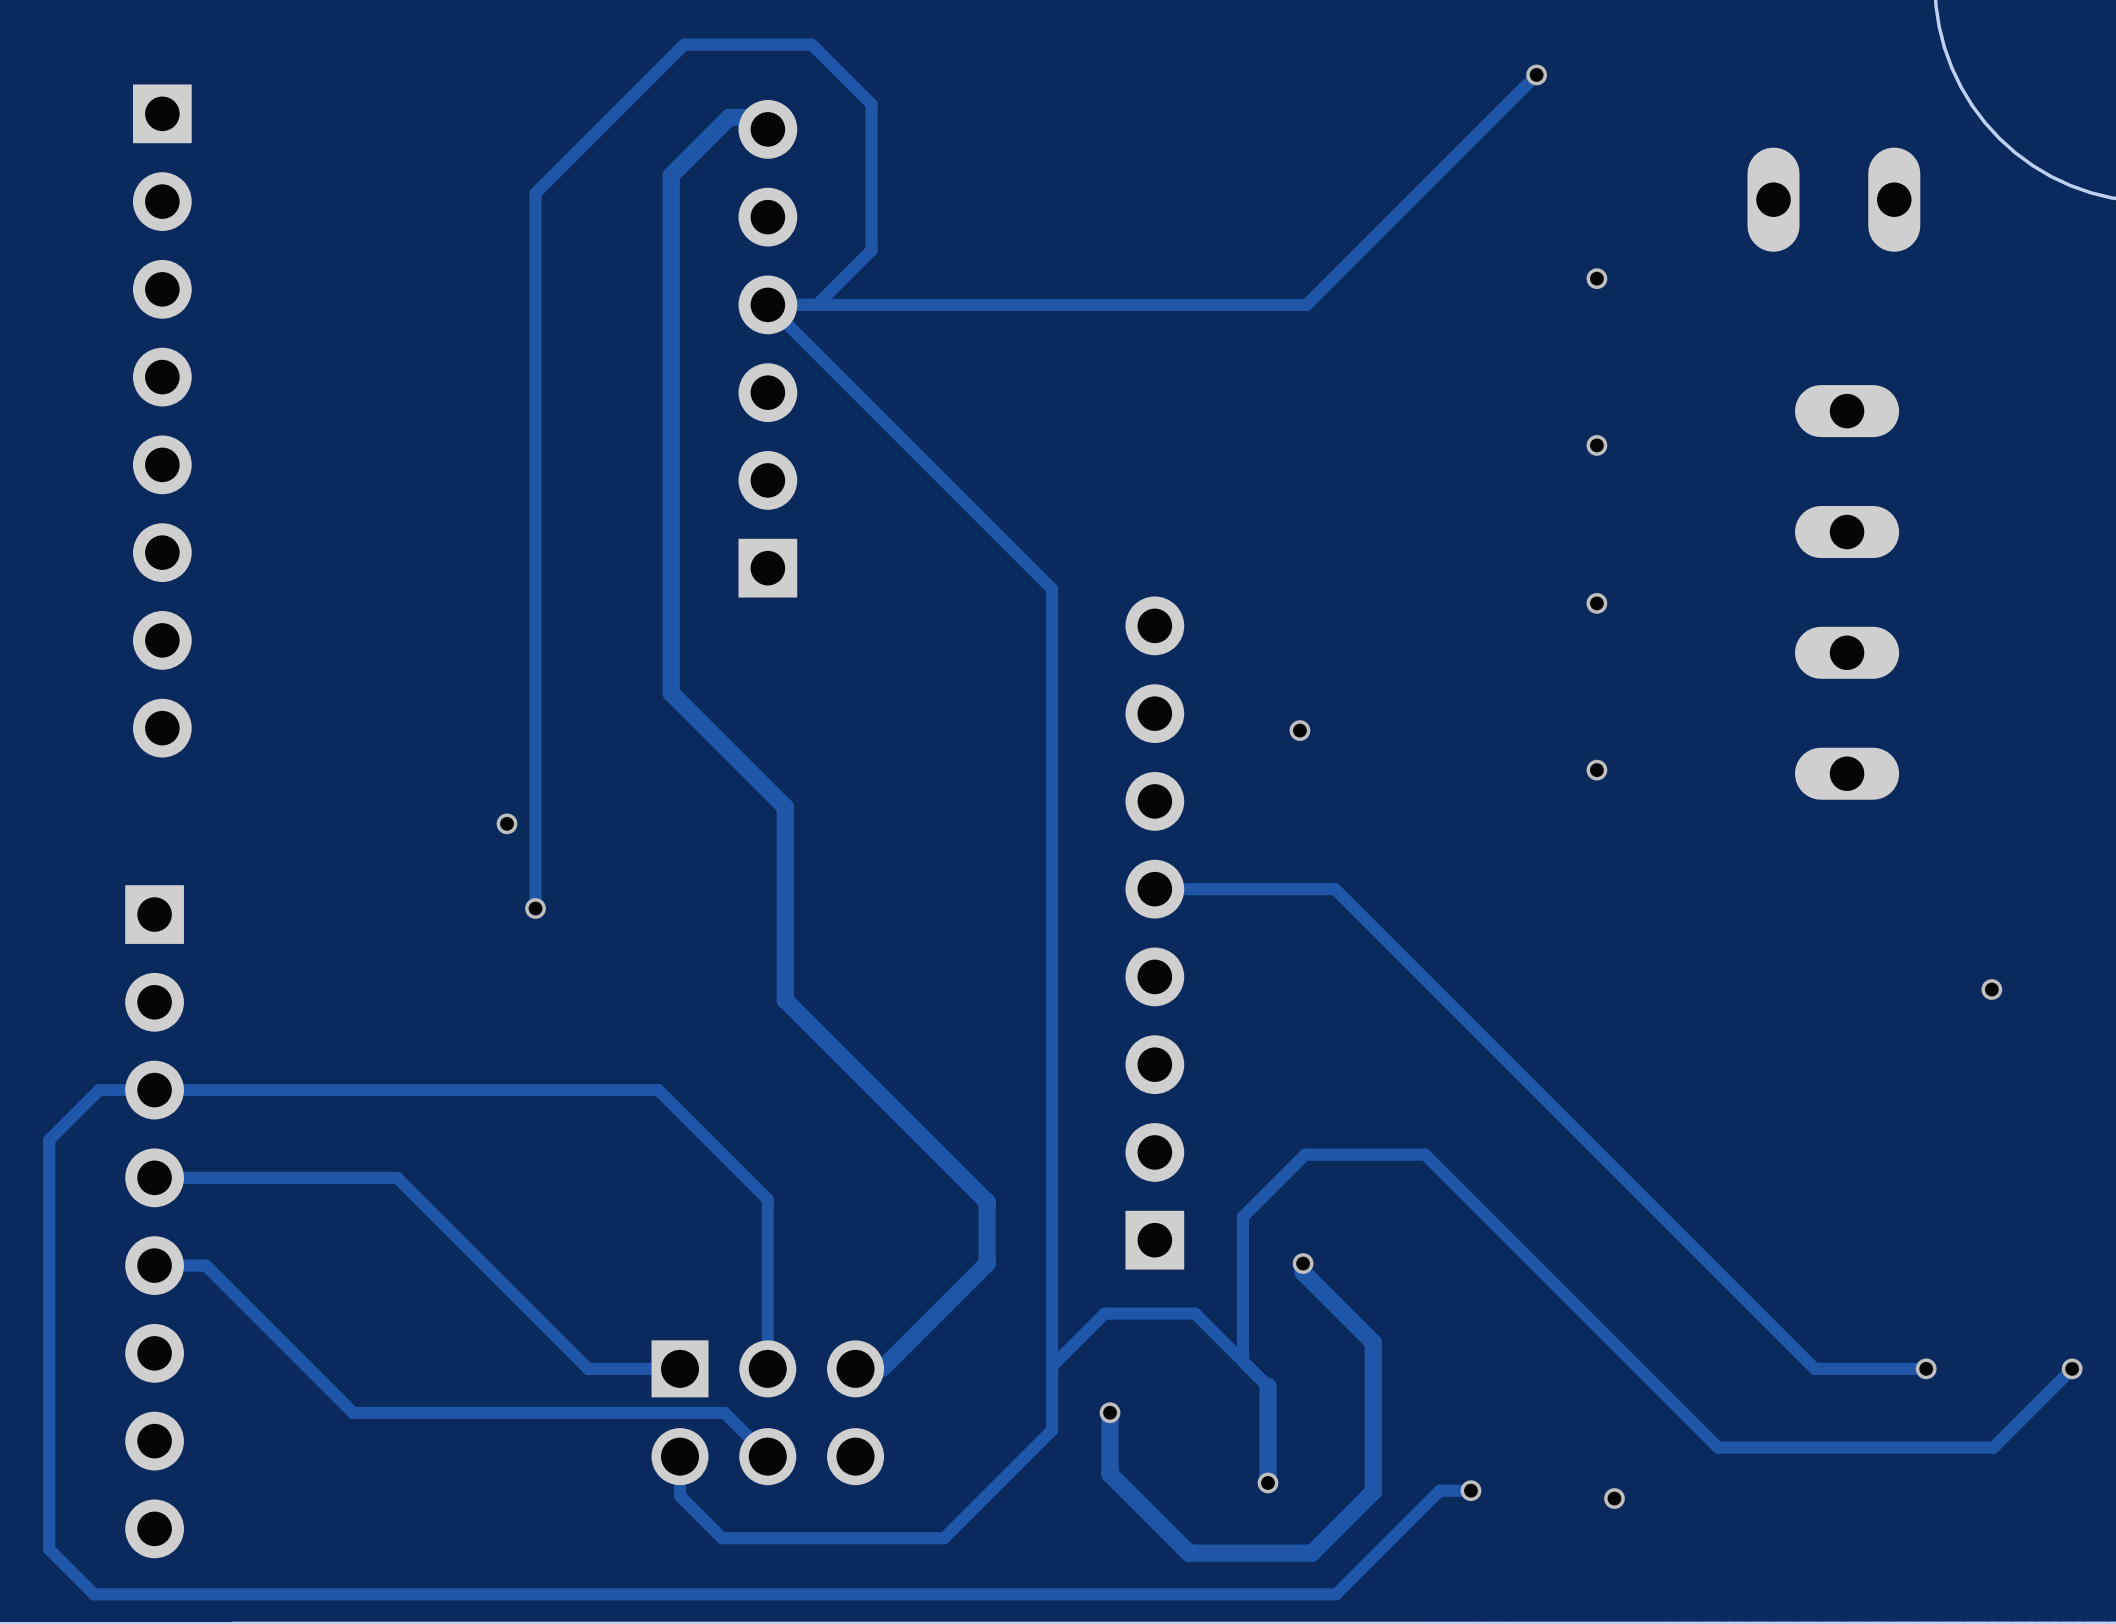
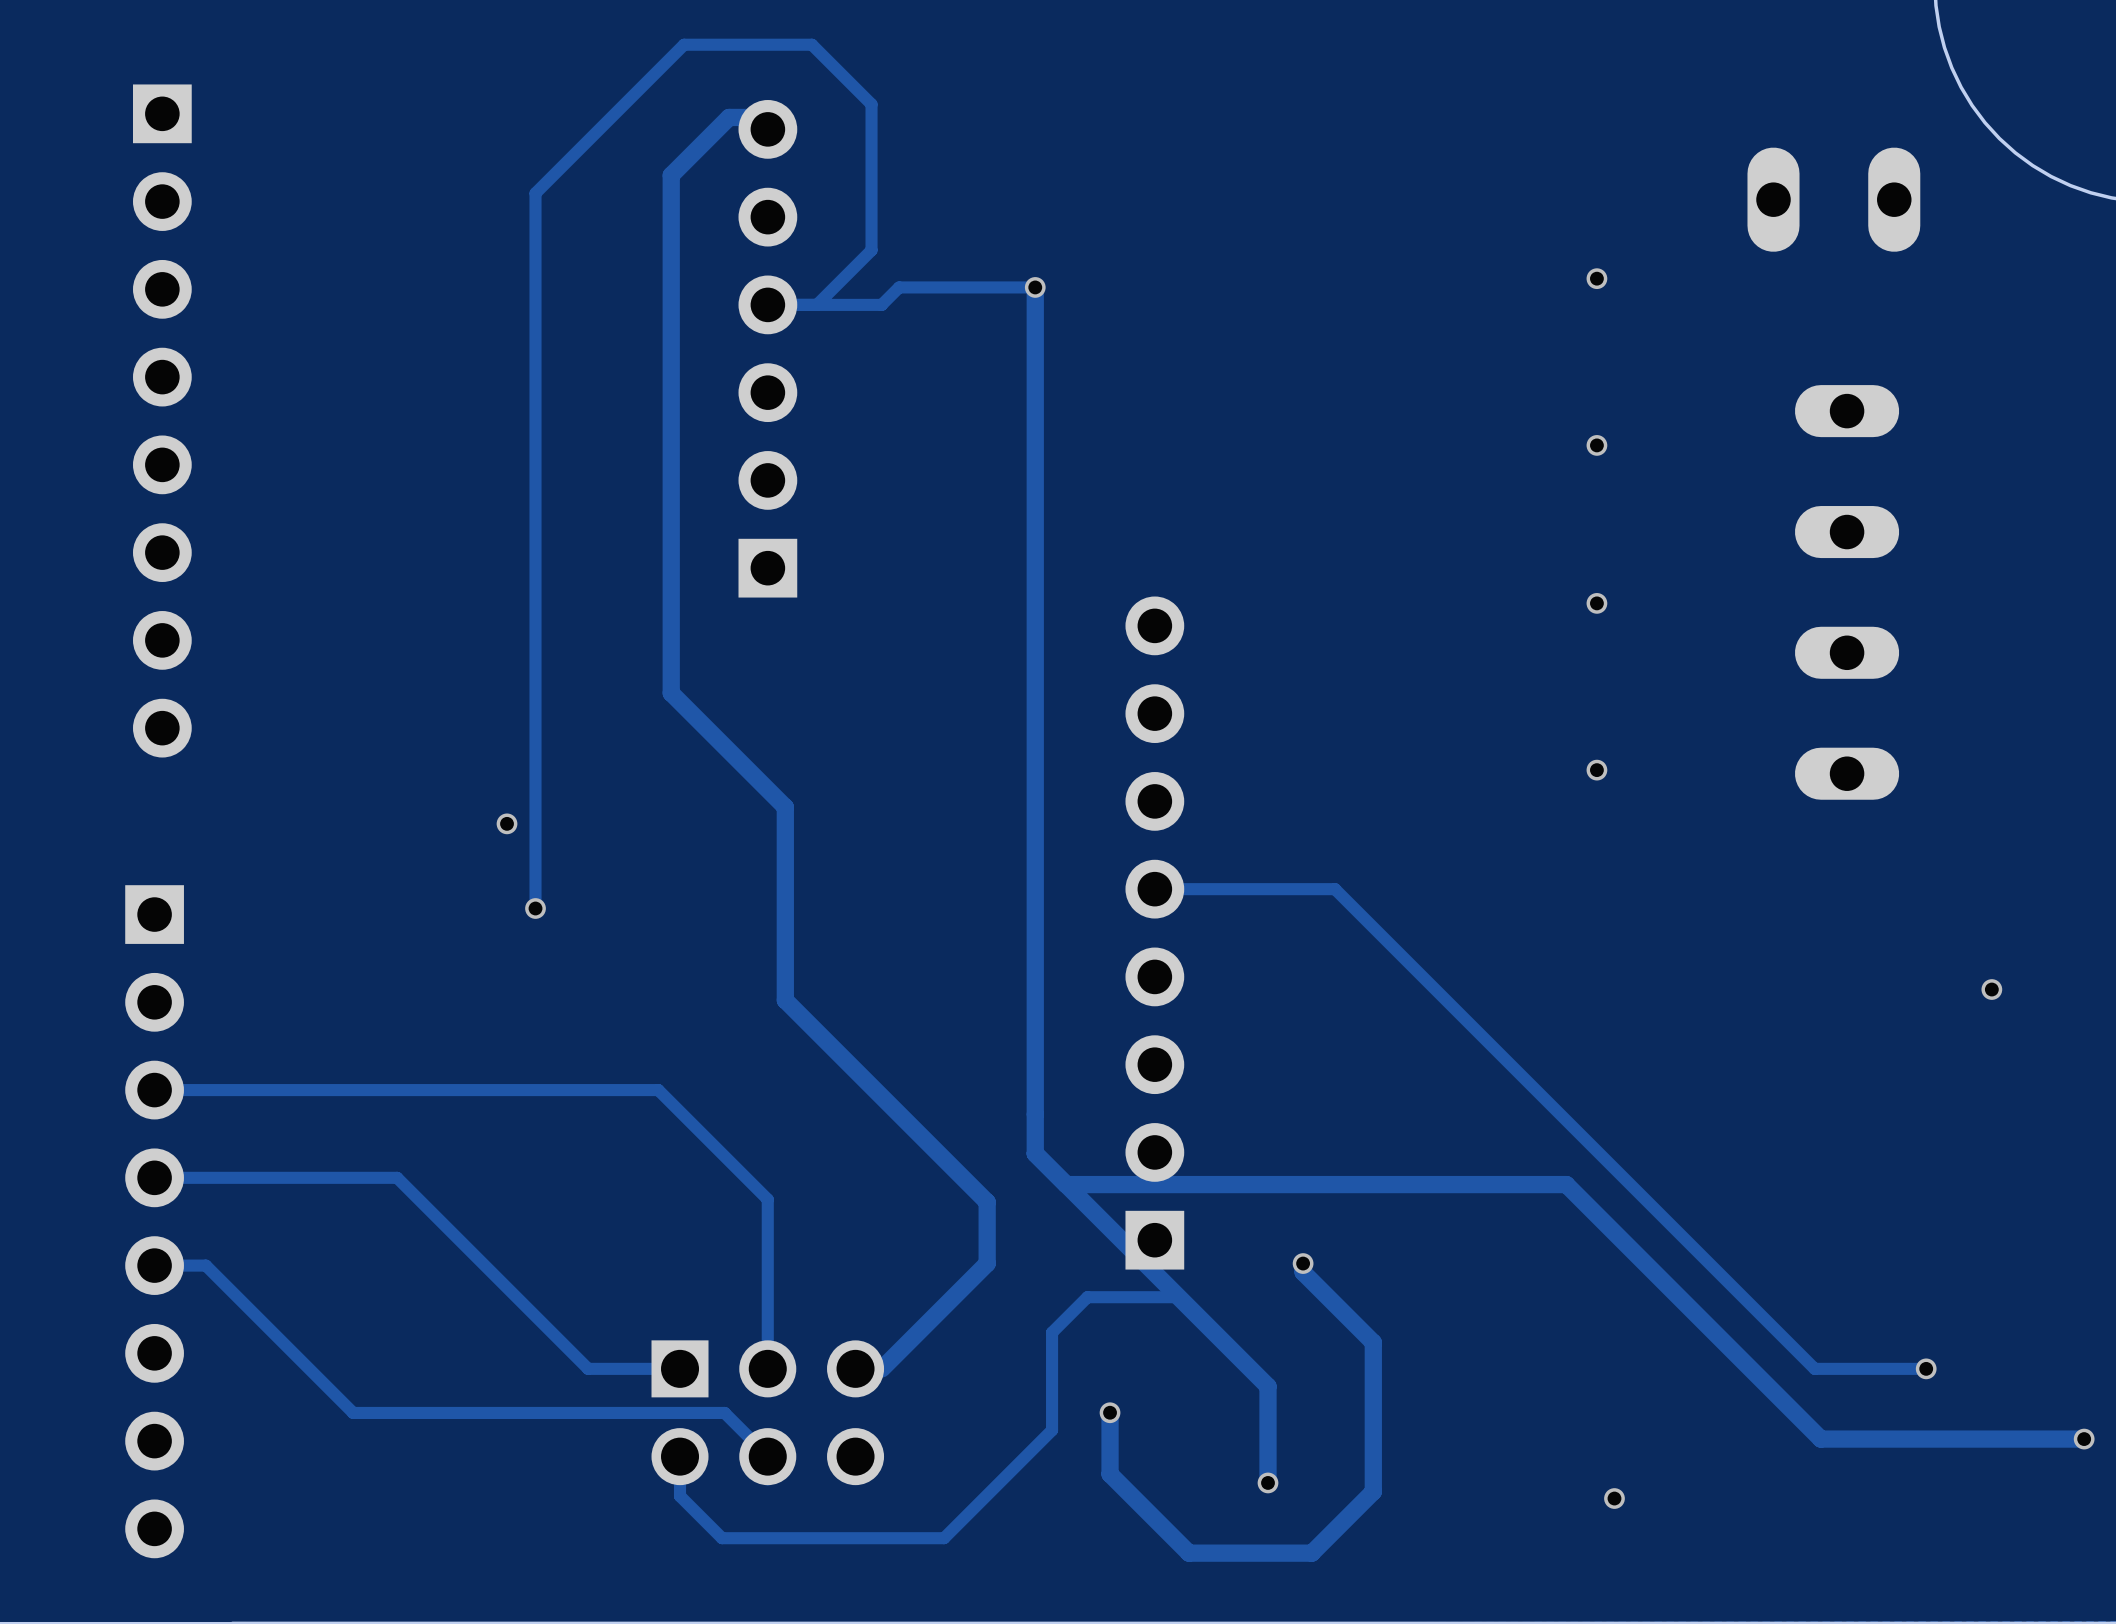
via: (1536, 74) -> none
track: (1537, 74) (1306, 304) (881, 304) -> (1268, 1386) (1035, 1153) (1035, 287) (899, 287) (881, 304)
via: none -> (1035, 287)
track: (767, 304) (1052, 589) (1052, 1332) -> none
via: (1299, 730) -> none
track: (154, 1090) (99, 1090) (49, 1139) (49, 1549) (94, 1594) (1336, 1594) (1439, 1490) (1470, 1490) -> none
track: none -> (1066, 1184) (1566, 1184) (1820, 1439) (2084, 1439)
track: (1195, 1313) (1104, 1313) (1052, 1366) -> (1195, 1313) (1178, 1297) (1087, 1297) (1052, 1332)
track: (1242, 1361) (1242, 1216) (1305, 1154) (1425, 1154) (1718, 1447) (1993, 1447) (2072, 1368) -> none
via position: (2072, 1368) -> (2084, 1439)
via: (1470, 1490) -> none

